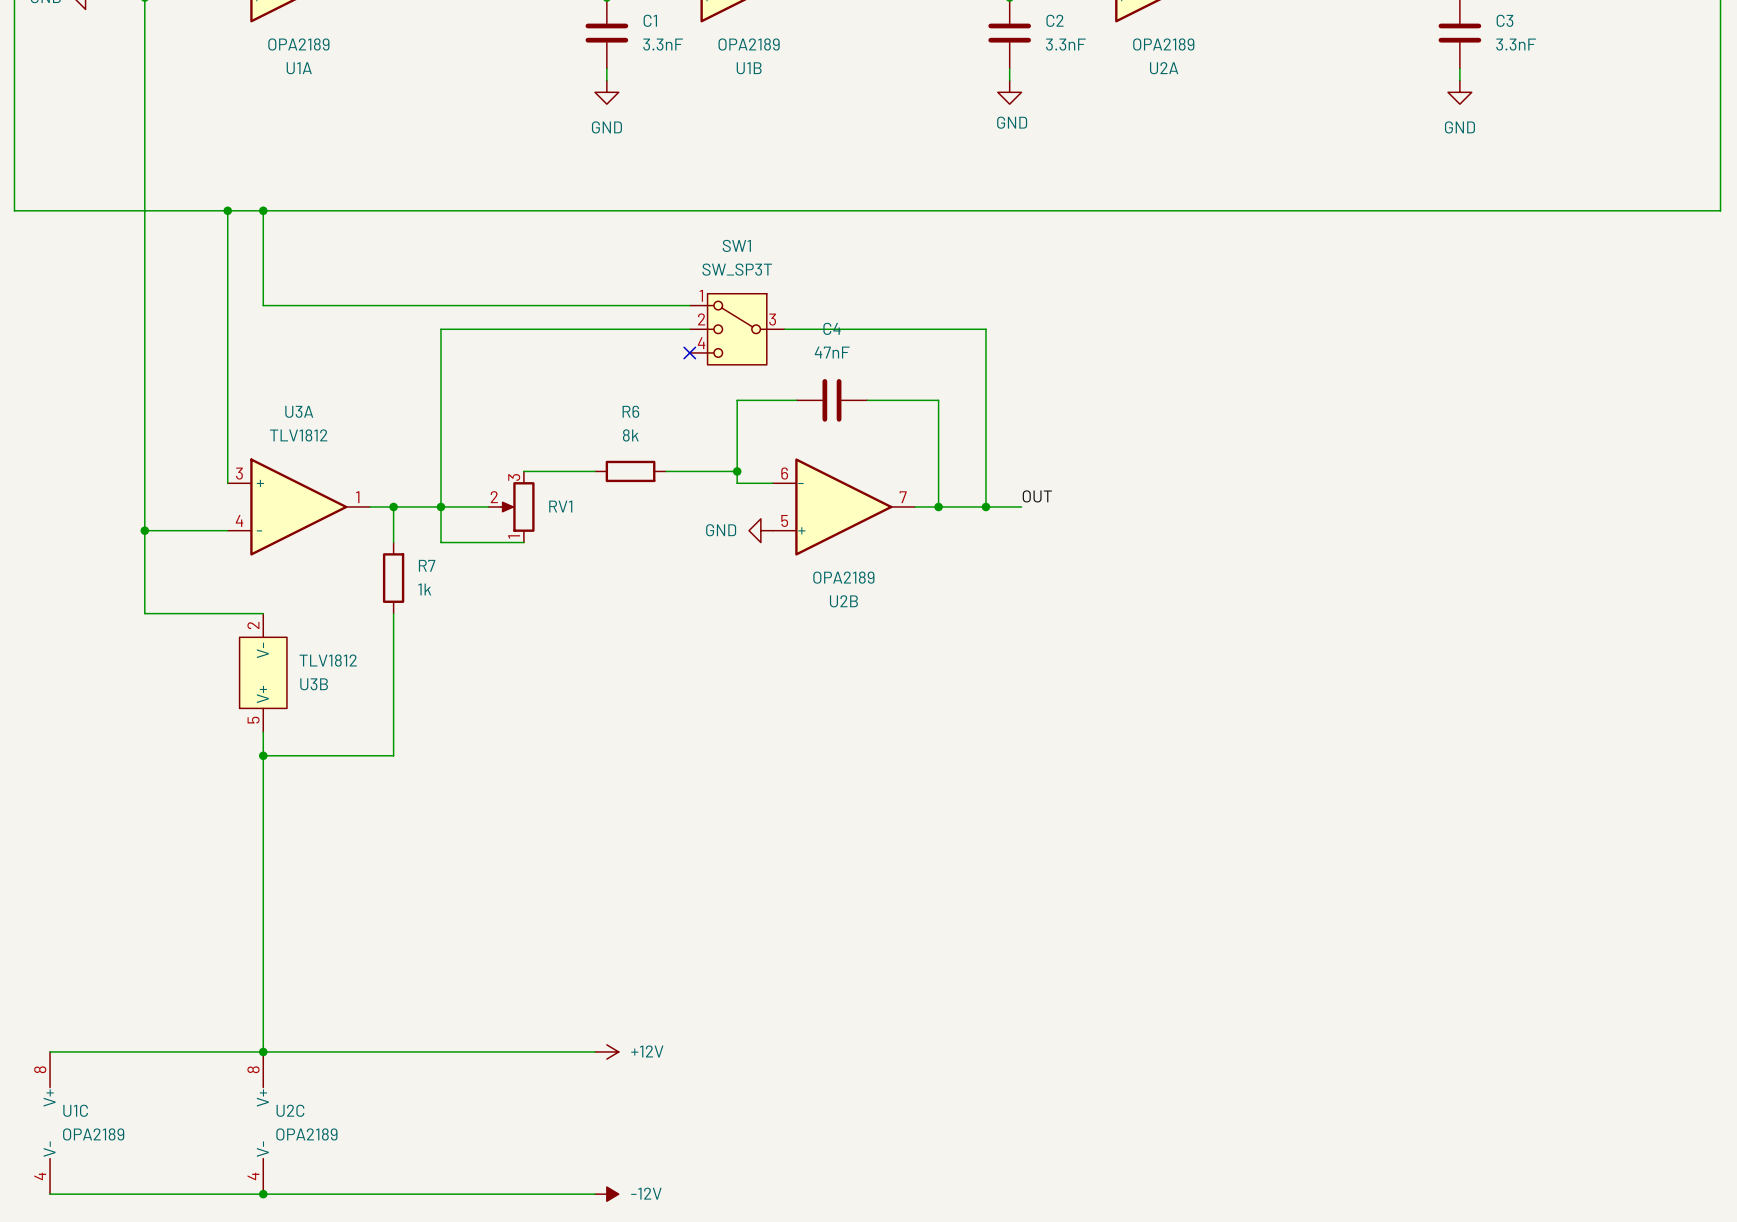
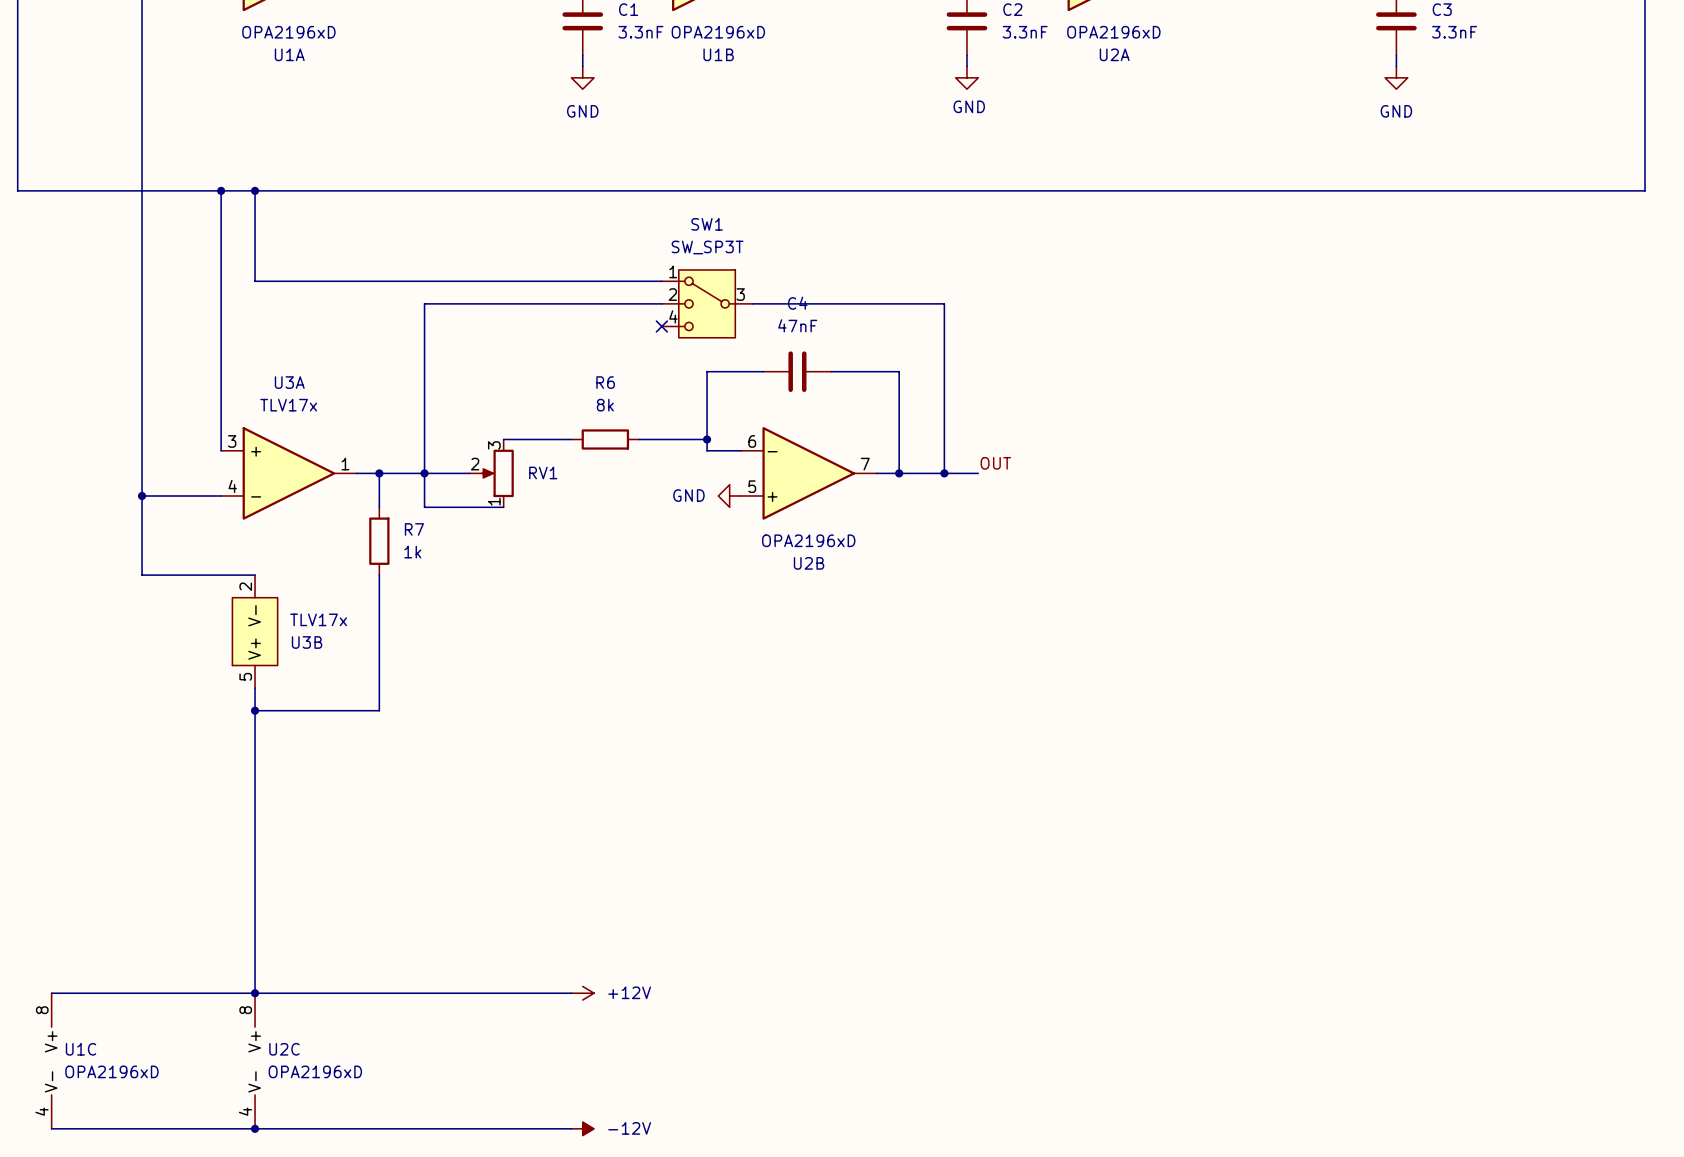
U1A value: OPA2189 (298, 44) -> OPA2196xD (288, 32)
U1B value: OPA2189 (749, 44) -> OPA2196xD (718, 32)
U2A value: OPA2189 (1163, 44) -> OPA2196xD (1113, 32)
U3A text: TLV1812 (298, 435) -> TLV17x (288, 405)
U2B value: OPA2189 (843, 577) -> OPA2196xD (808, 540)
U3B text: TLV1812 (328, 660) -> TLV17x (318, 619)
U1C value: OPA2189 (93, 1134) -> OPA2196xD (111, 1071)
U2C value: OPA2189 (306, 1134) -> OPA2196xD (315, 1071)

